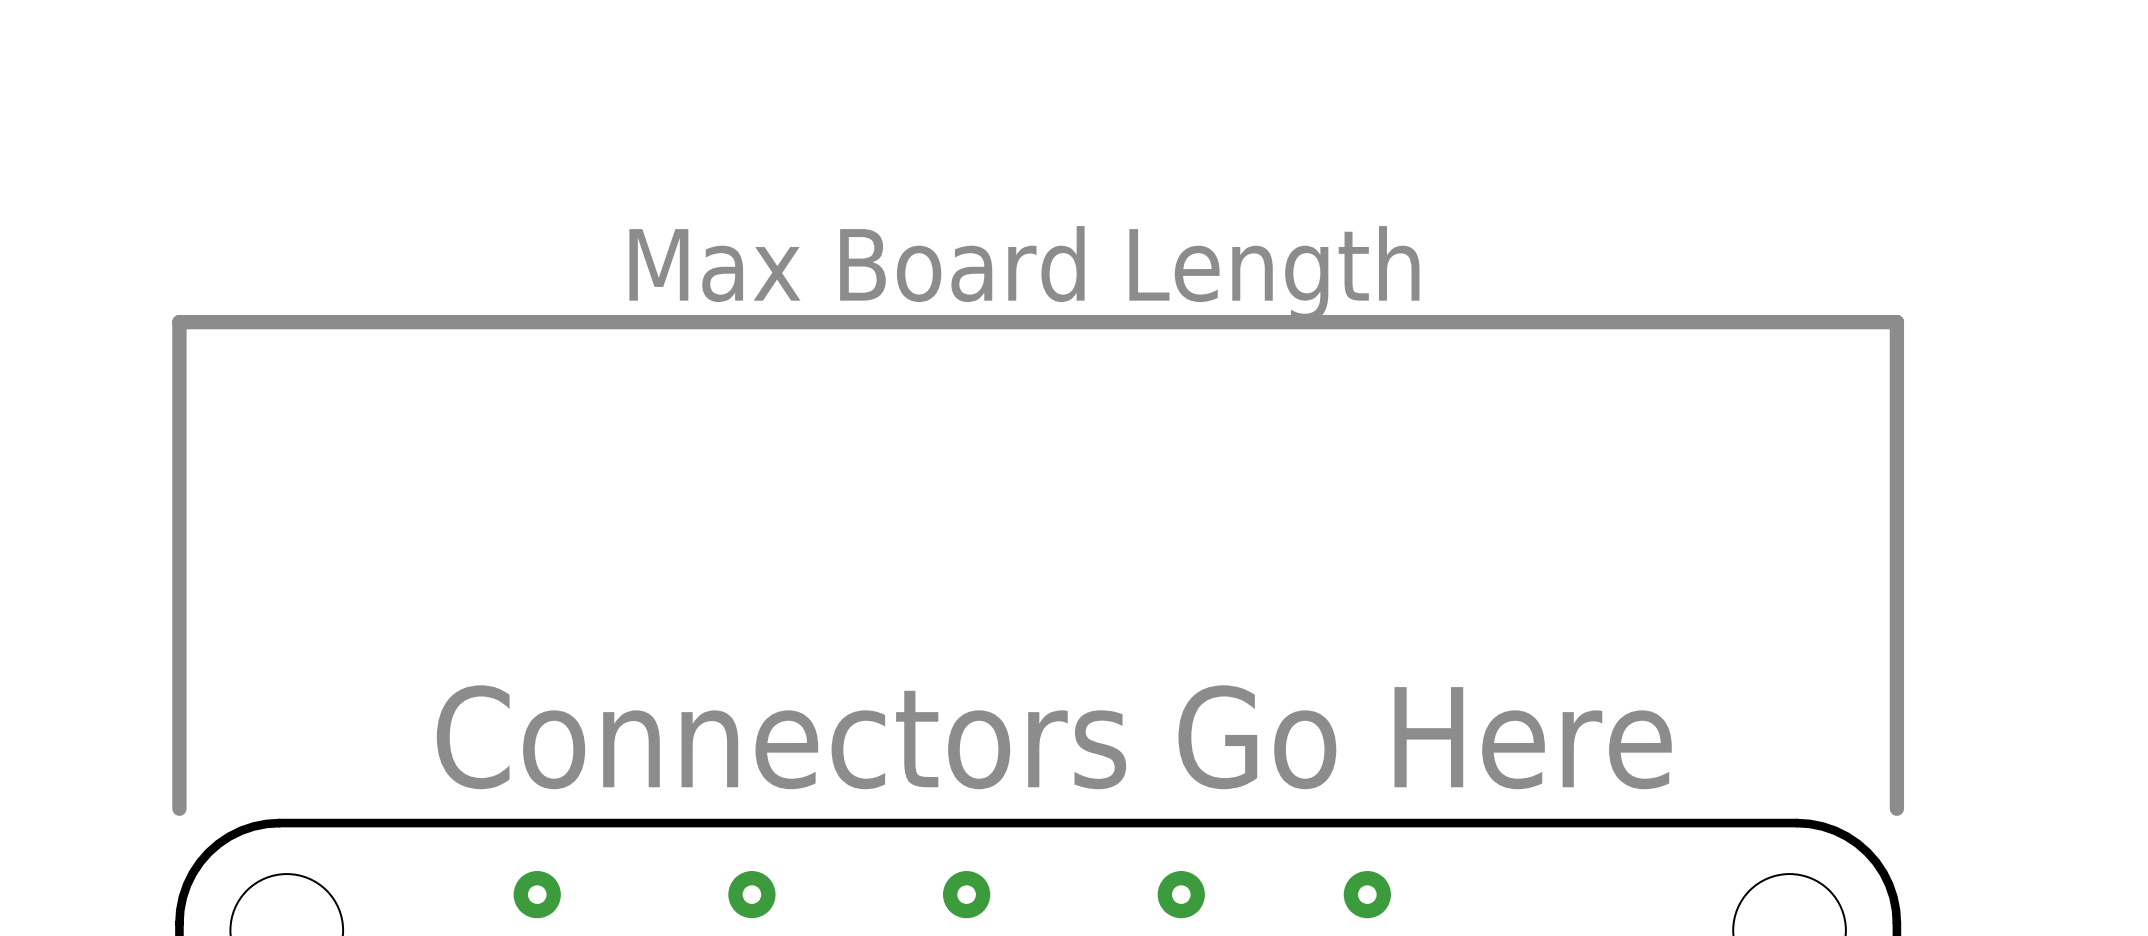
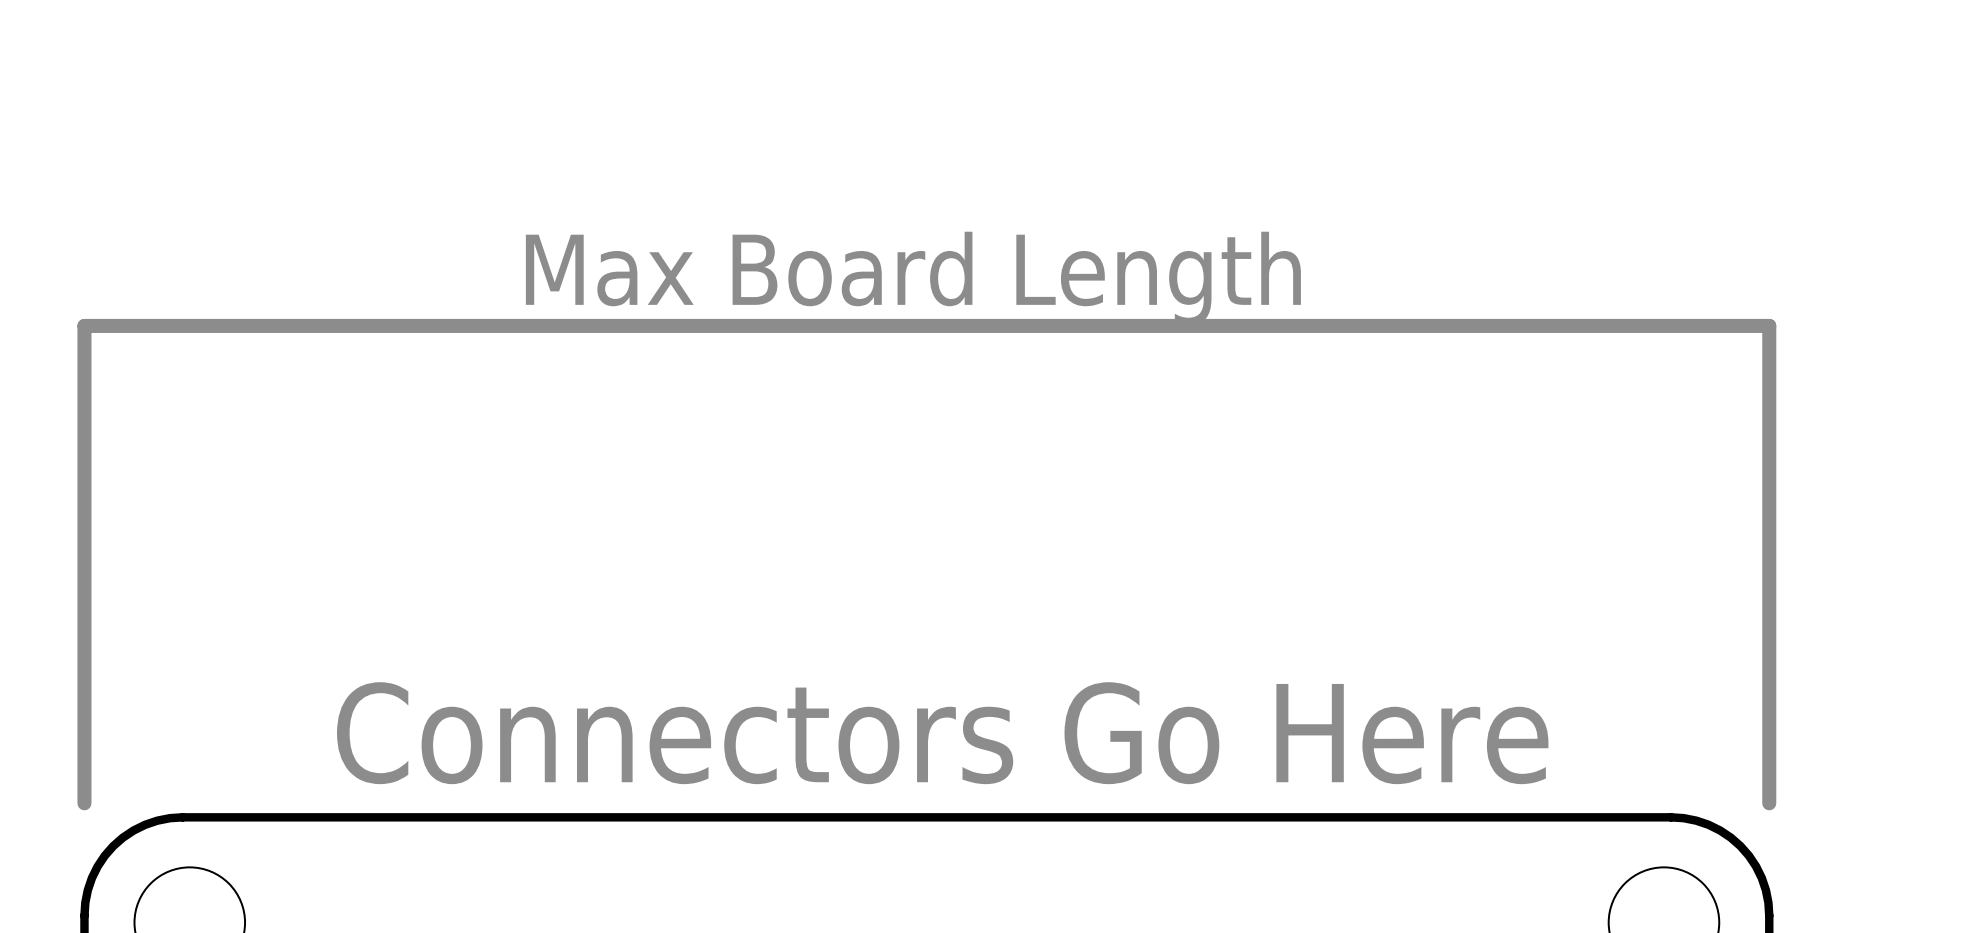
via: (537, 894) -> none
via: (751, 894) -> none
via: (966, 894) -> none
via: (1181, 894) -> none
via: (1367, 894) -> none

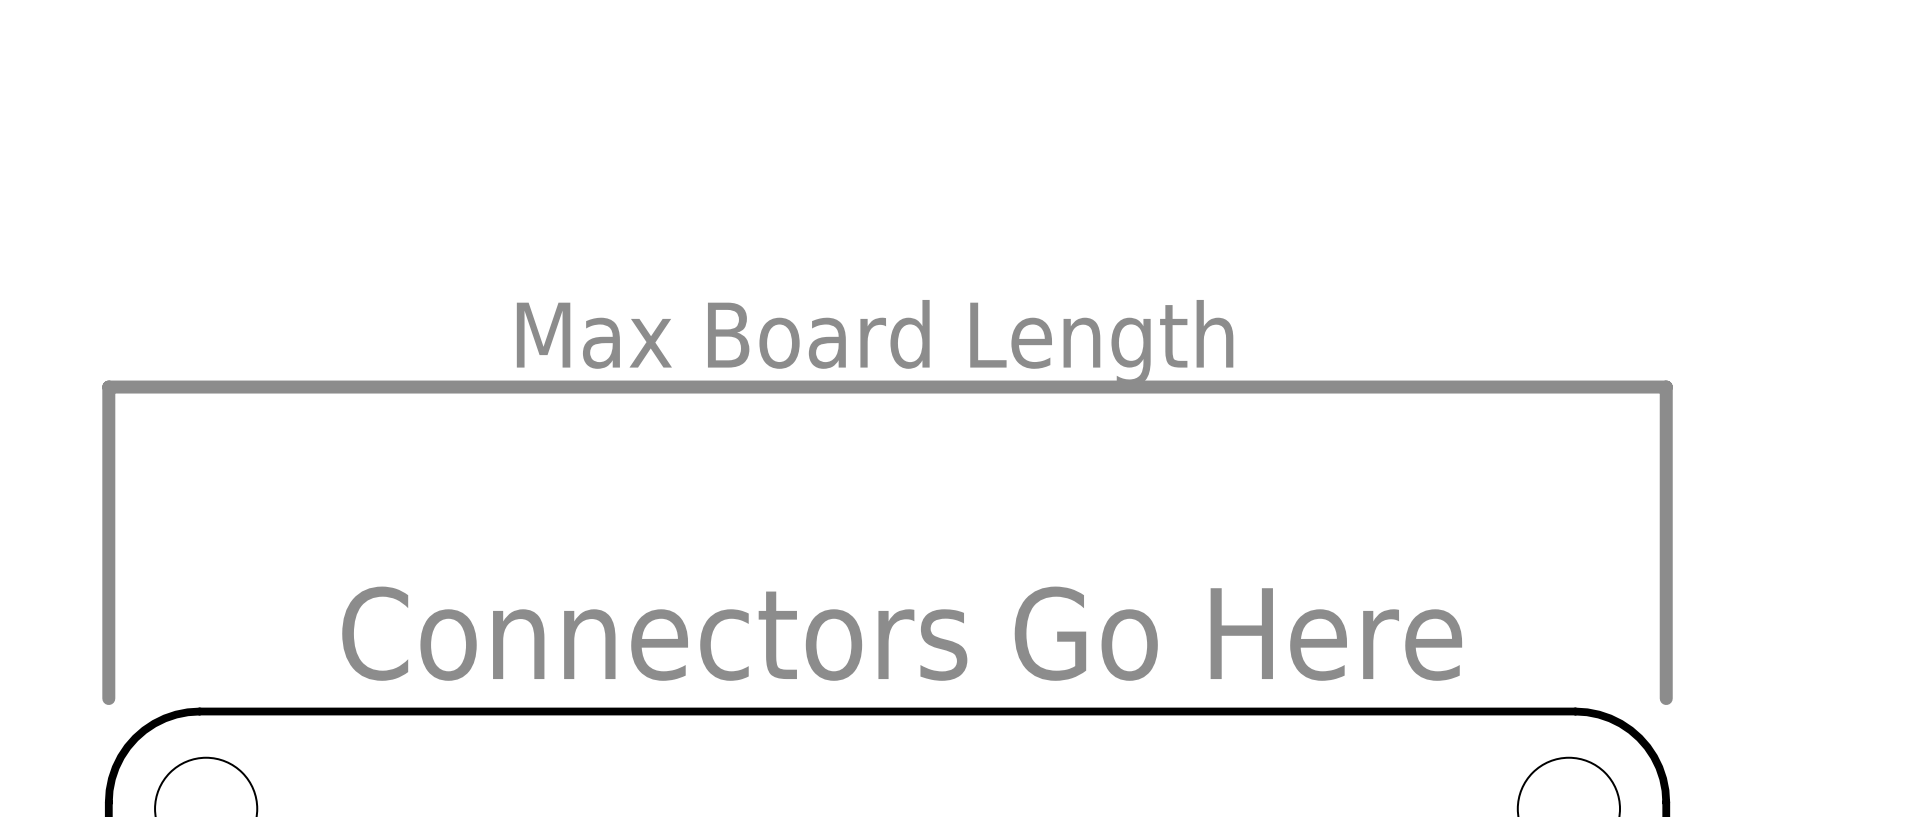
text position: Max Board Length (913, 278) -> Max Board Length (875, 343)
line: (84, 466) (84, 325) (1769, 325) (1769, 466) -> (108, 387) (1666, 387)

